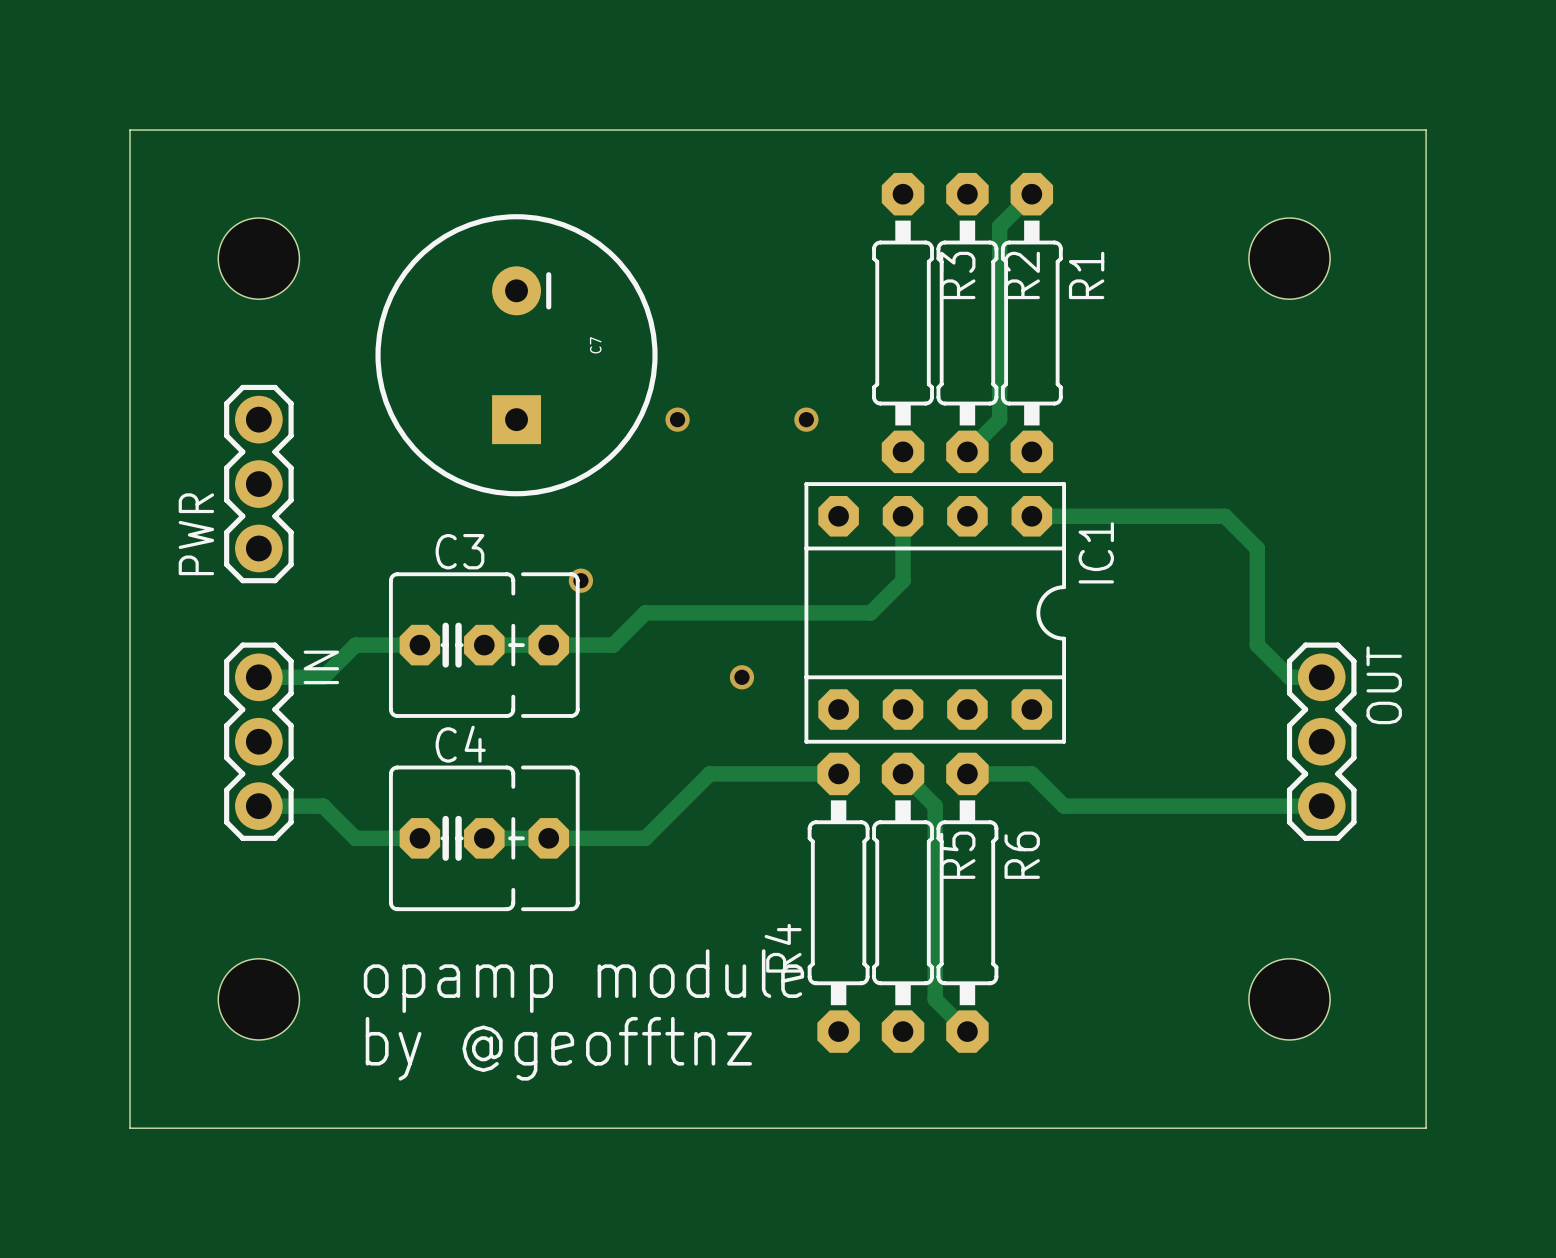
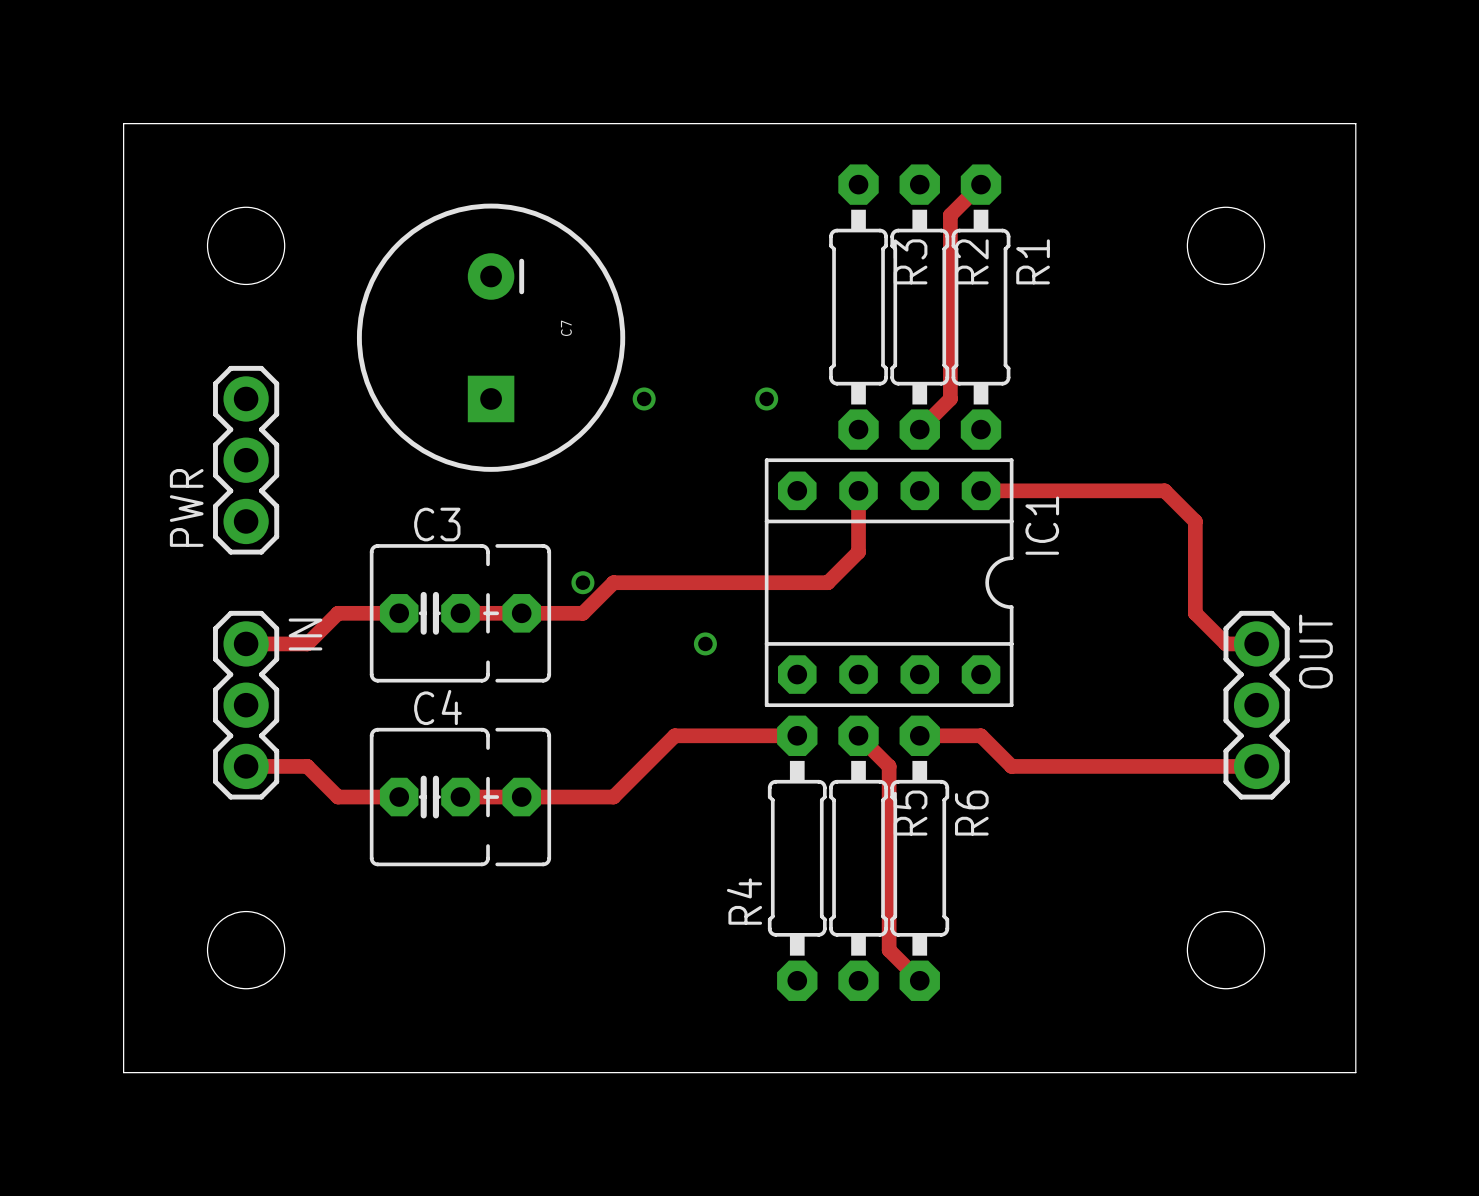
via position: (580, 580) -> (582, 582)
text: opamp module (583, 981) -> none
text: by @geofftnz (558, 1048) -> none

